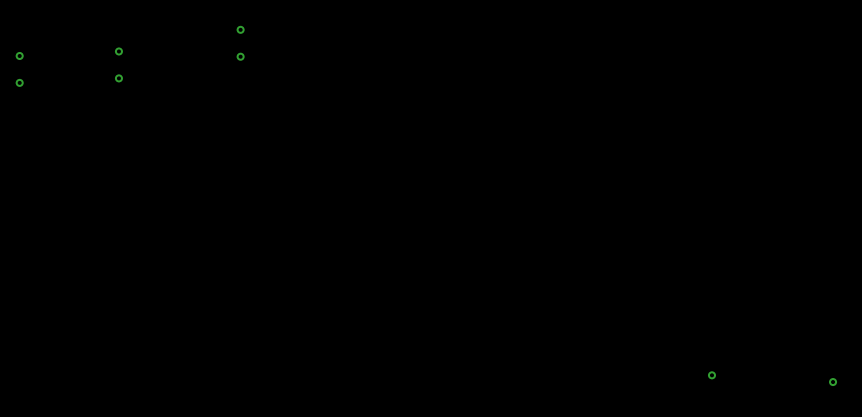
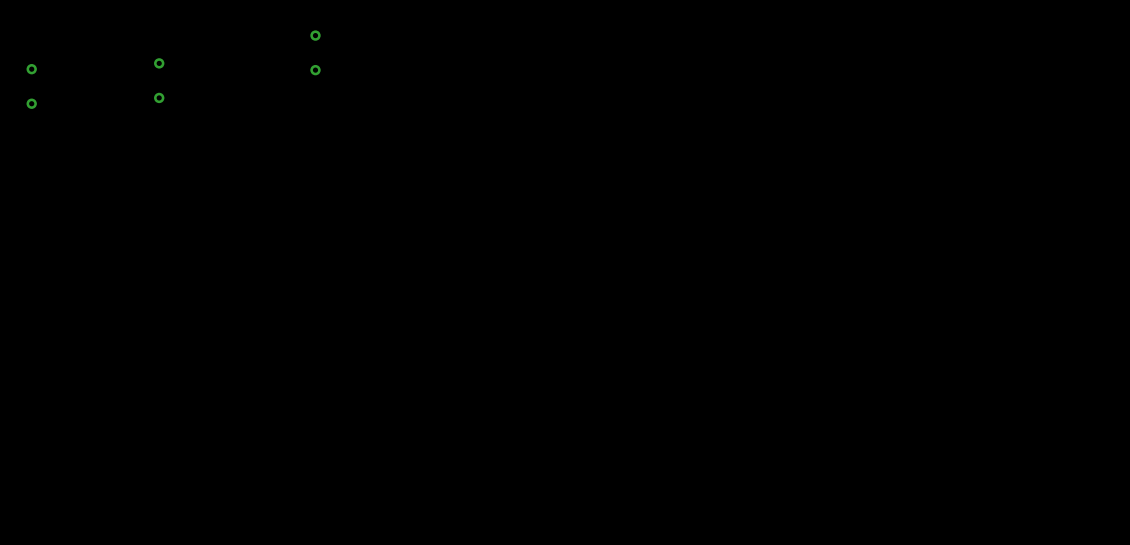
via: (711, 375) -> none
via: (833, 382) -> none

